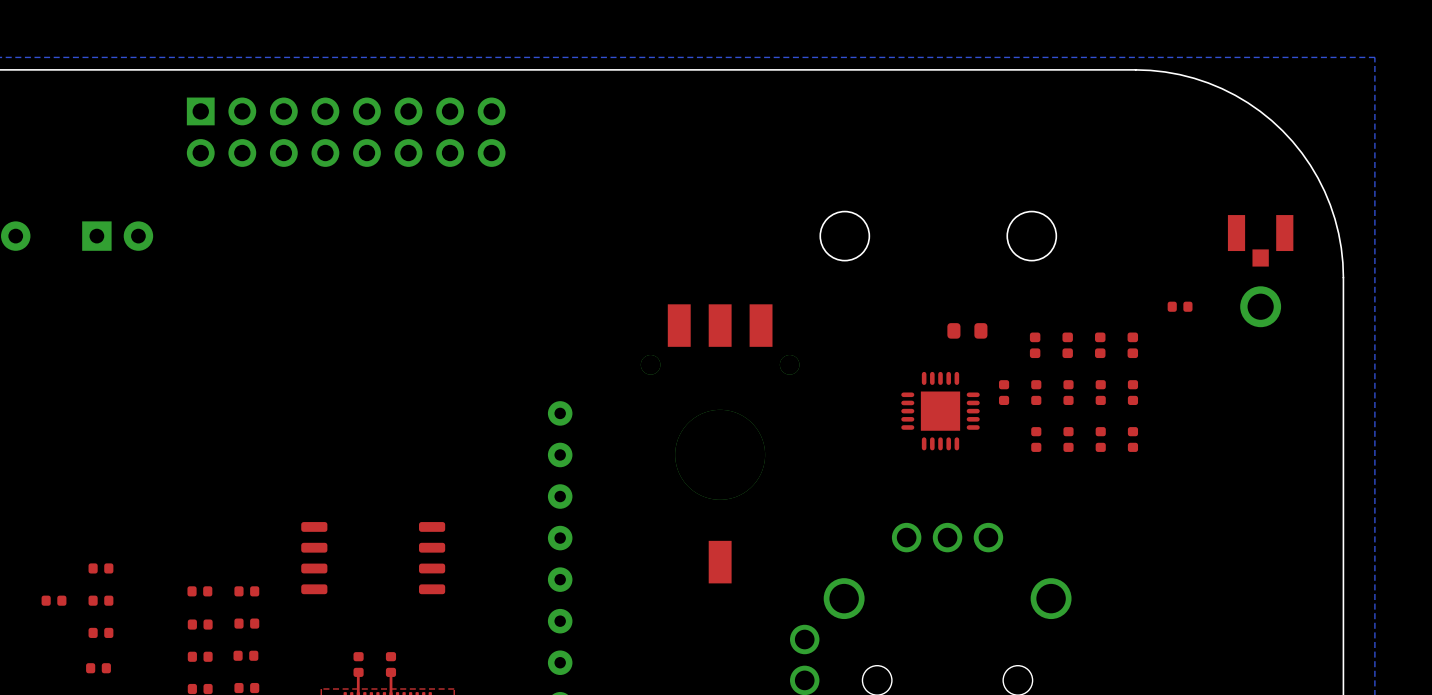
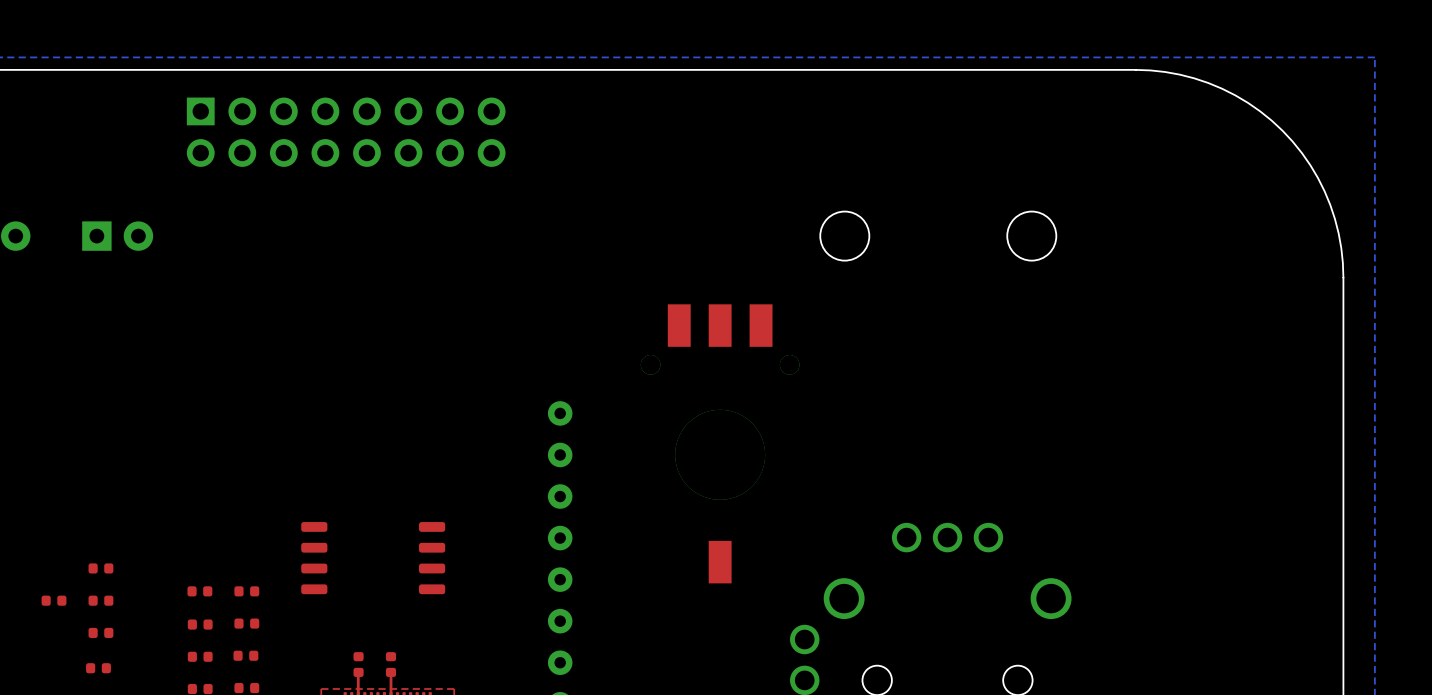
part: (1260, 240) -> none
part: (1180, 306) -> none
part: (1260, 306) -> none
part: (967, 330) -> none
part: (1035, 345) -> none
part: (1067, 345) -> none
part: (1100, 345) -> none
part: (1132, 345) -> none
part: (1004, 392) -> none
part: (1036, 392) -> none
part: (1068, 392) -> none
part: (1100, 392) -> none
part: (1132, 392) -> none
part: (940, 411) -> none
part: (1036, 439) -> none
part: (1068, 439) -> none
part: (1100, 439) -> none
part: (1132, 439) -> none

